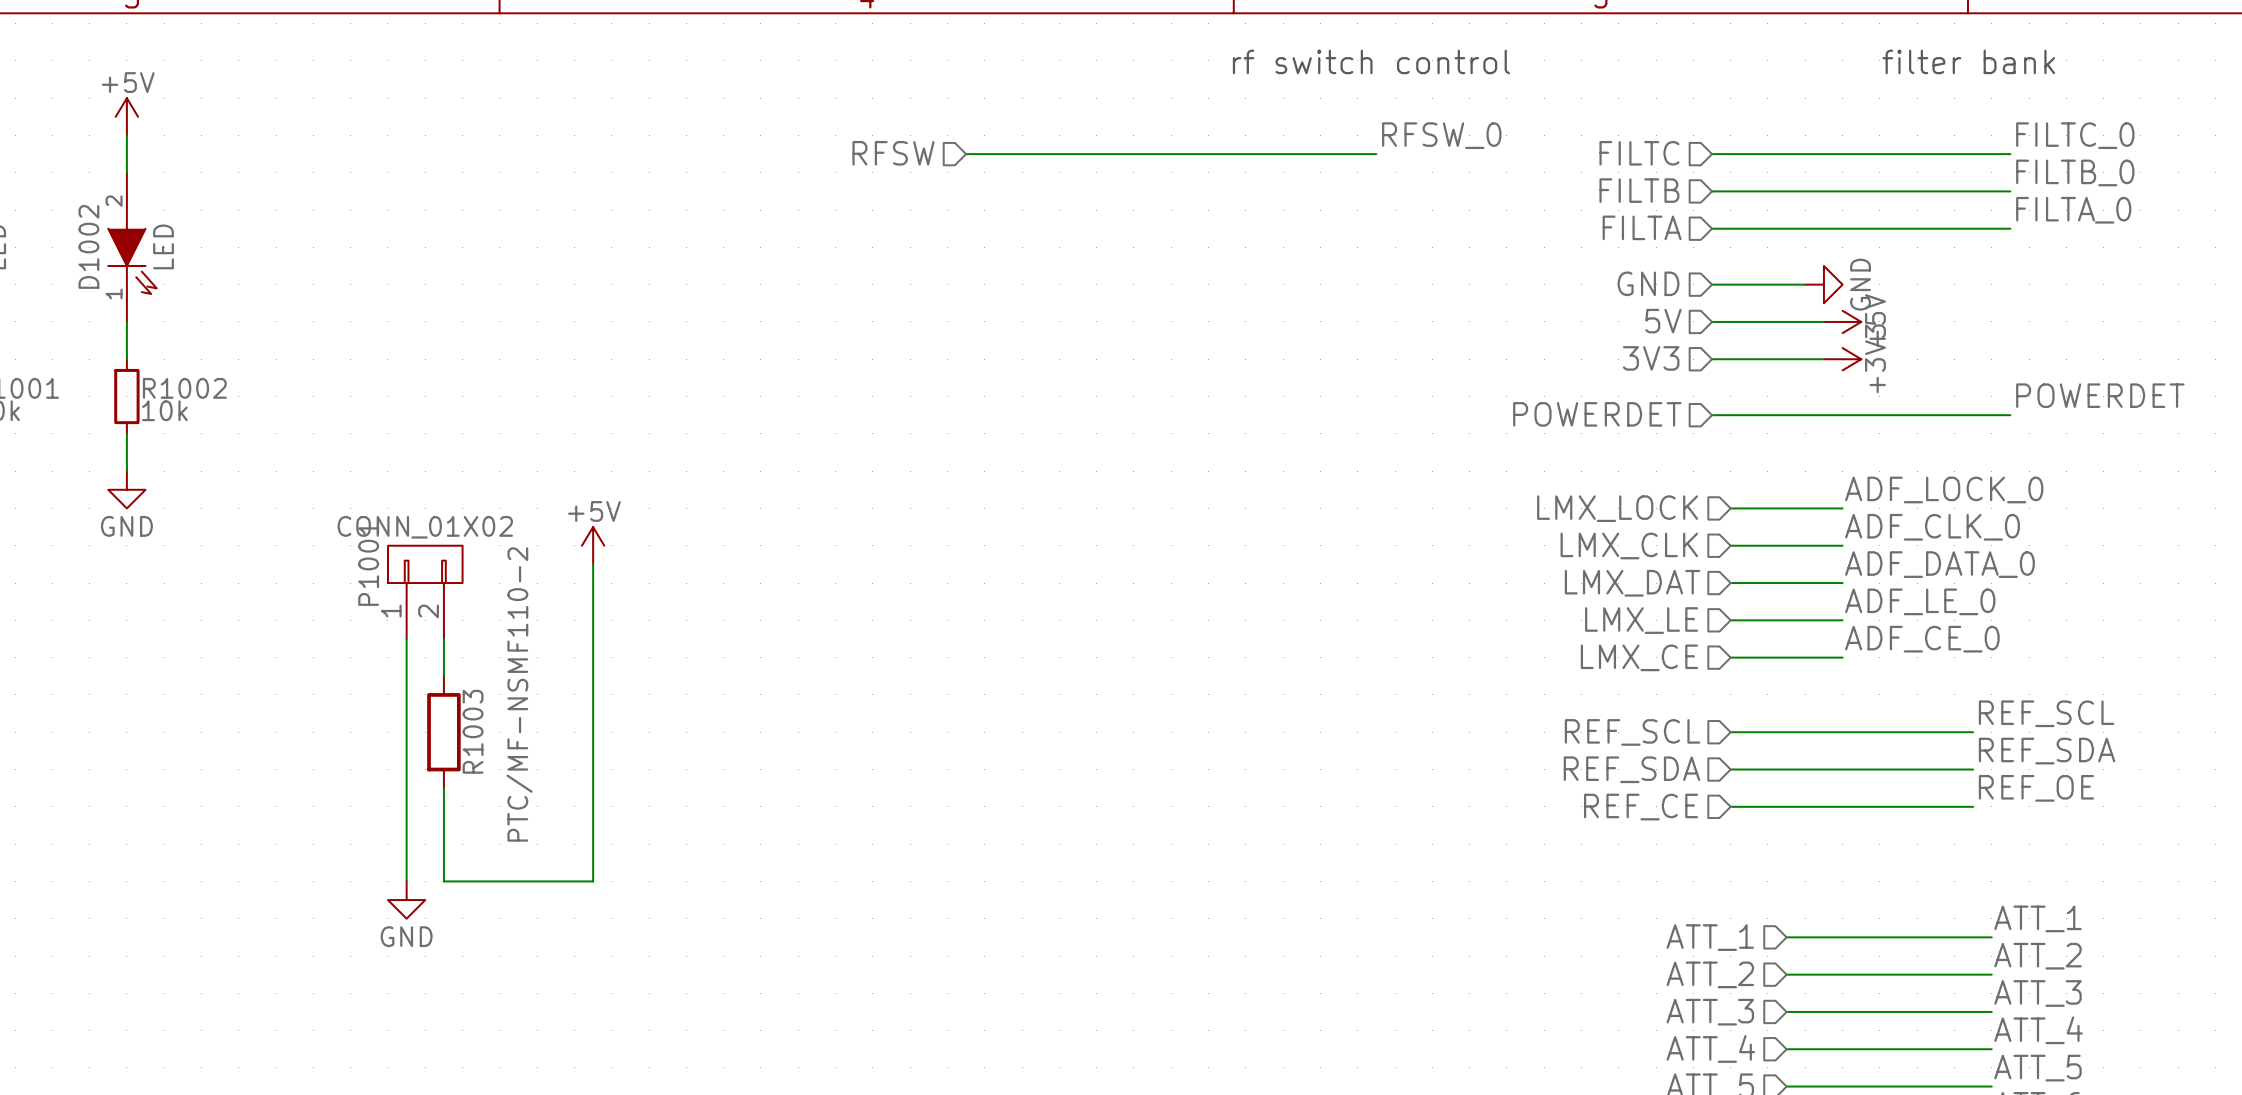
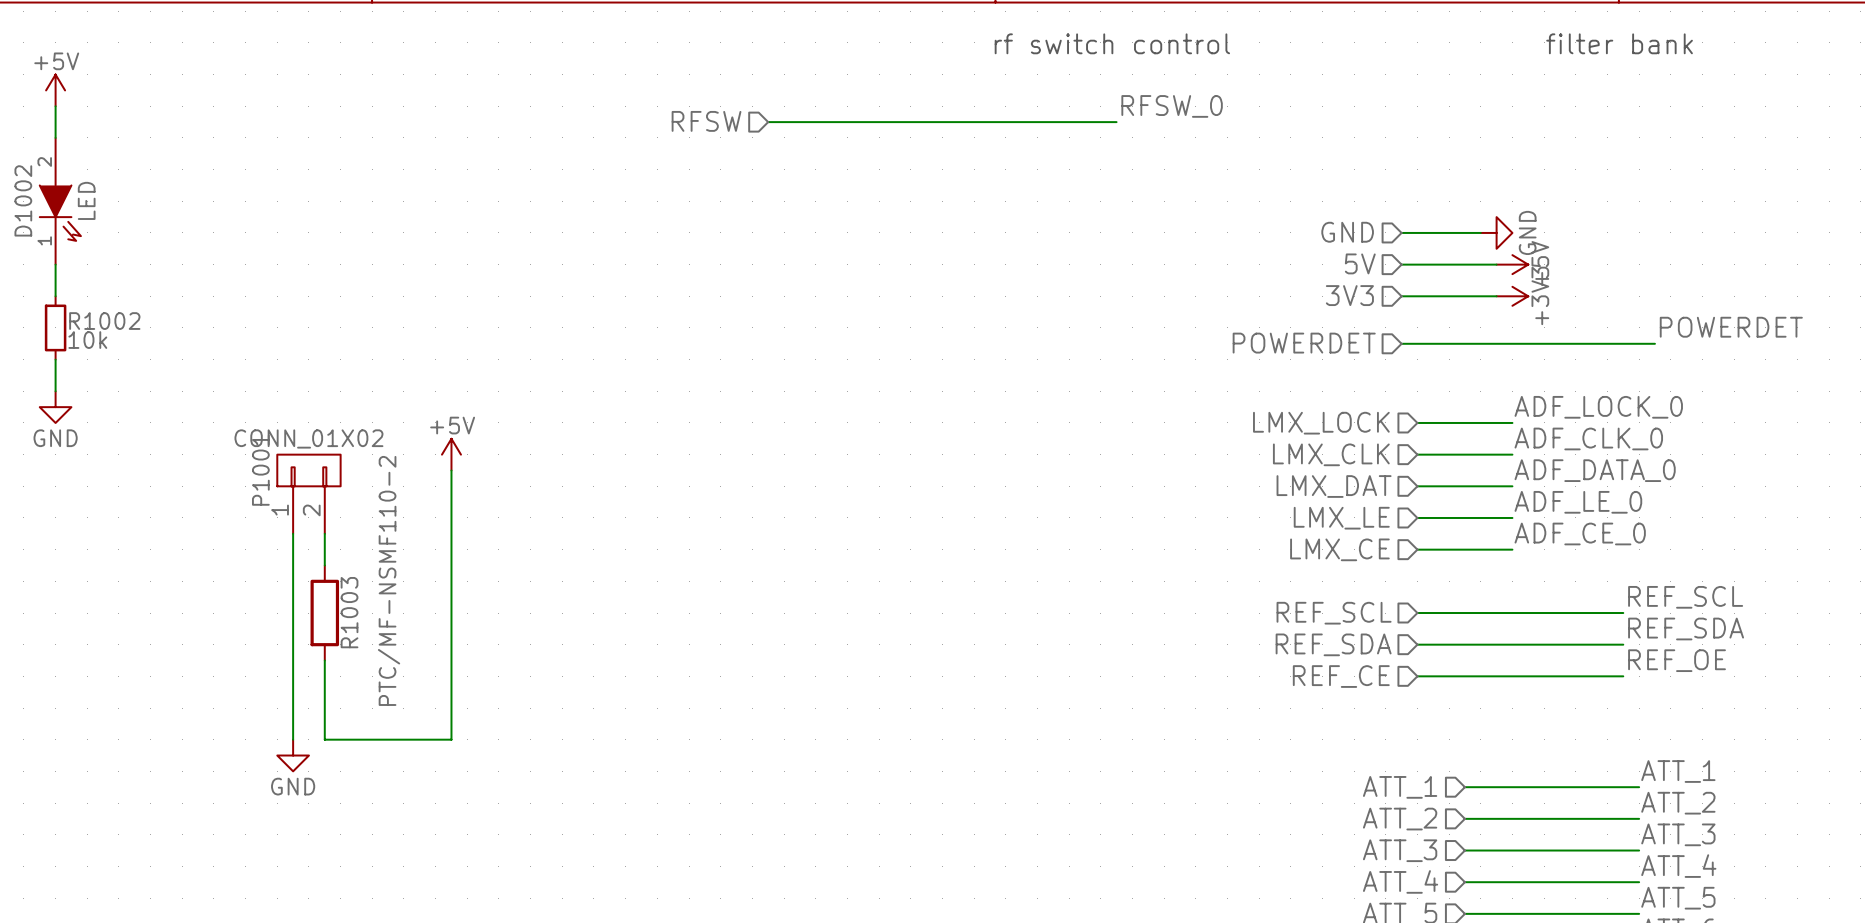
label: FILTC_0 (2075, 135) -> none
hierarchical label: FILTC (1639, 153) -> none
wire: (1712, 154) (2010, 154) -> none
label: FILTB_0 (2075, 172) -> none
hierarchical label: FILTB (1639, 190) -> none
wire: (1712, 191) (2010, 191) -> none
label: FILTA_0 (2073, 210) -> none
hierarchical label: FILTA (1642, 227) -> none
wire: (1712, 228) (2010, 228) -> none

